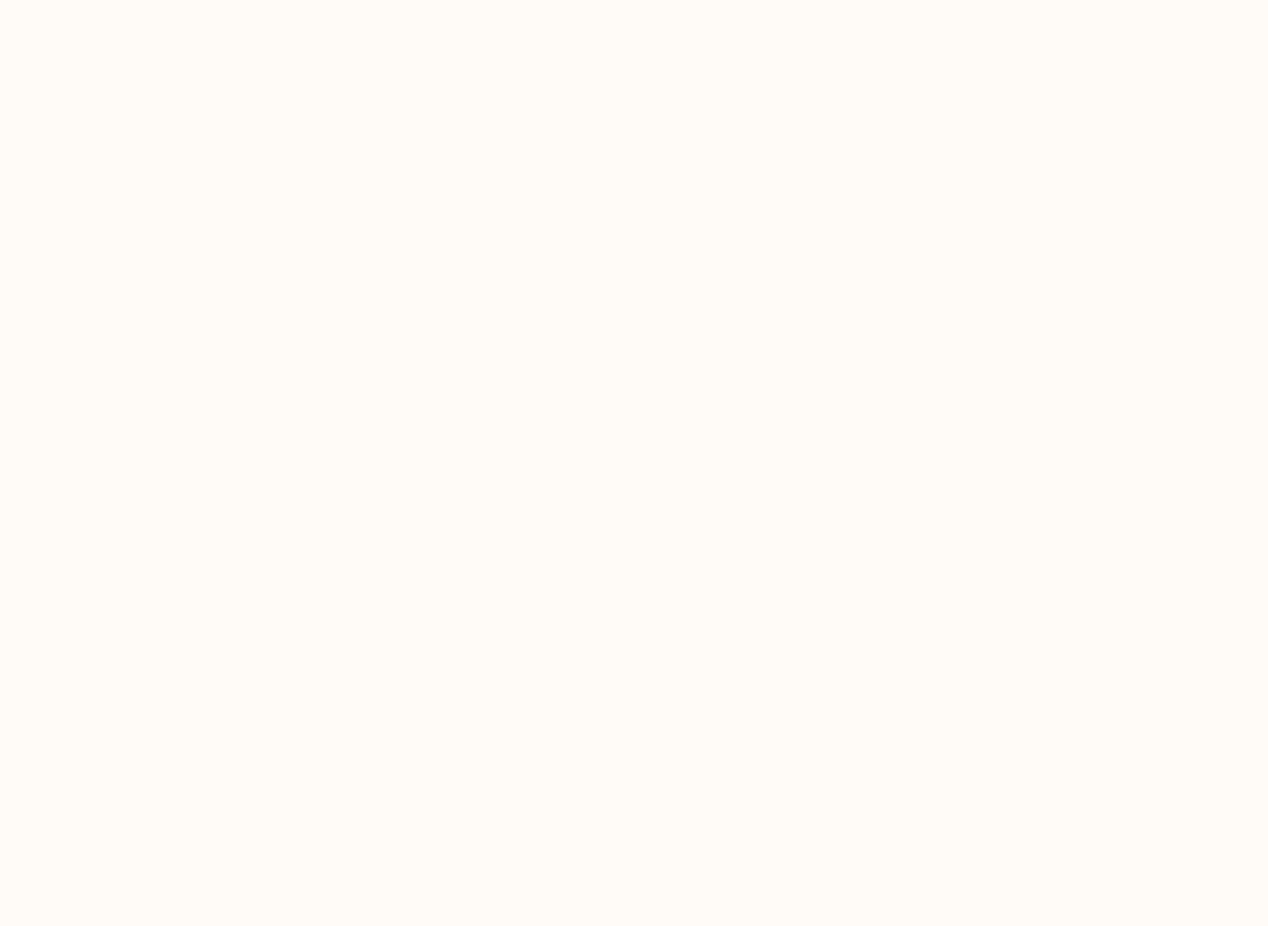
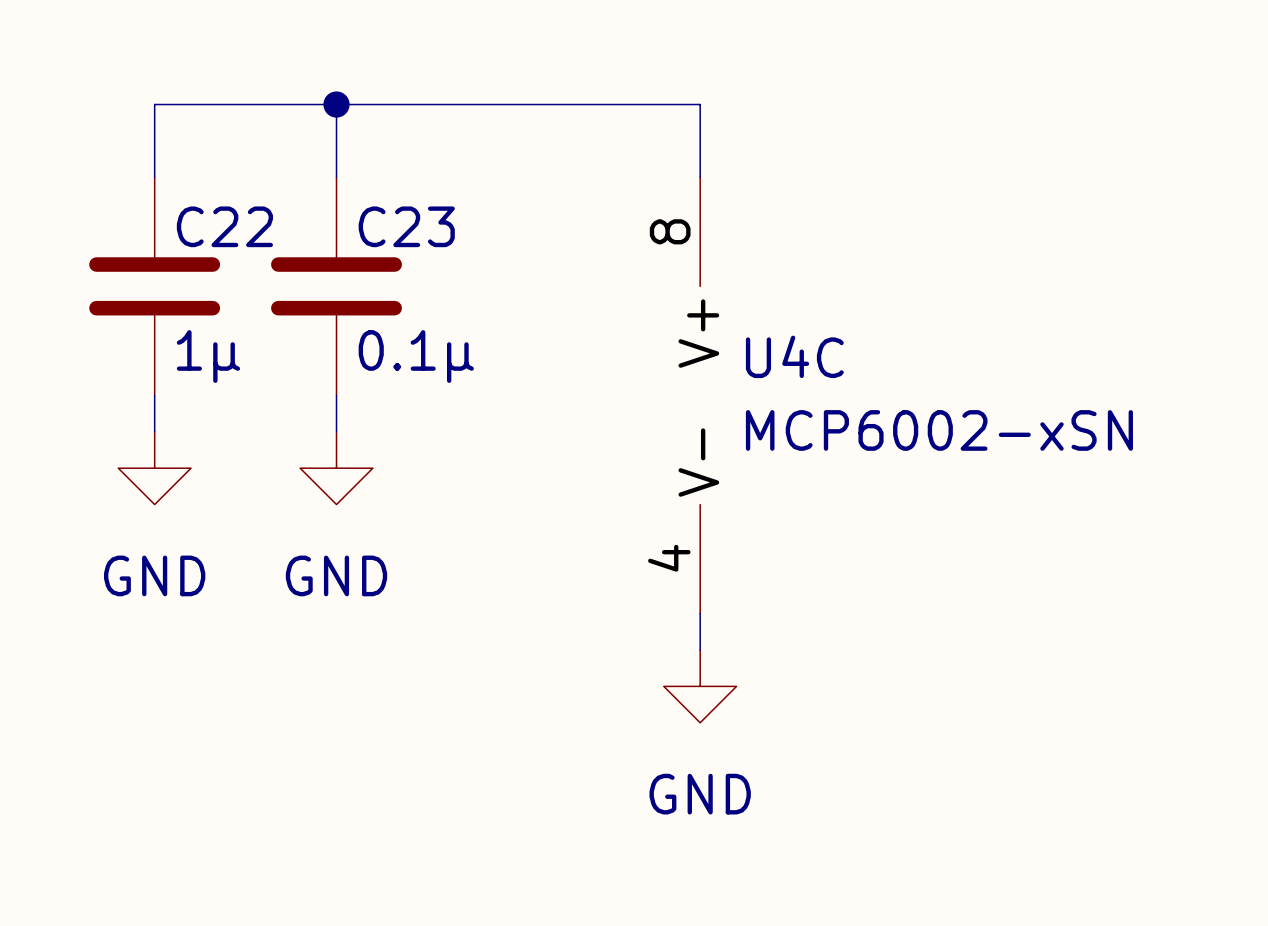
wire: none -> (336, 104) (336, 177)
junction: none -> (336, 104)
wire: none -> (154, 177) (154, 104) (700, 104) (700, 177)
C22: none -> 1µ (154, 286)
C23: none -> 0.1µ (336, 286)
wire: none -> (154, 395) (154, 431)
wire: none -> (336, 395) (336, 431)
U4C: none -> MCP6002-xSN (700, 395)
power symbol: none -> GND (154, 468)
power symbol: none -> GND (336, 468)
wire: none -> (700, 613) (700, 650)
power symbol: none -> GND (700, 686)

